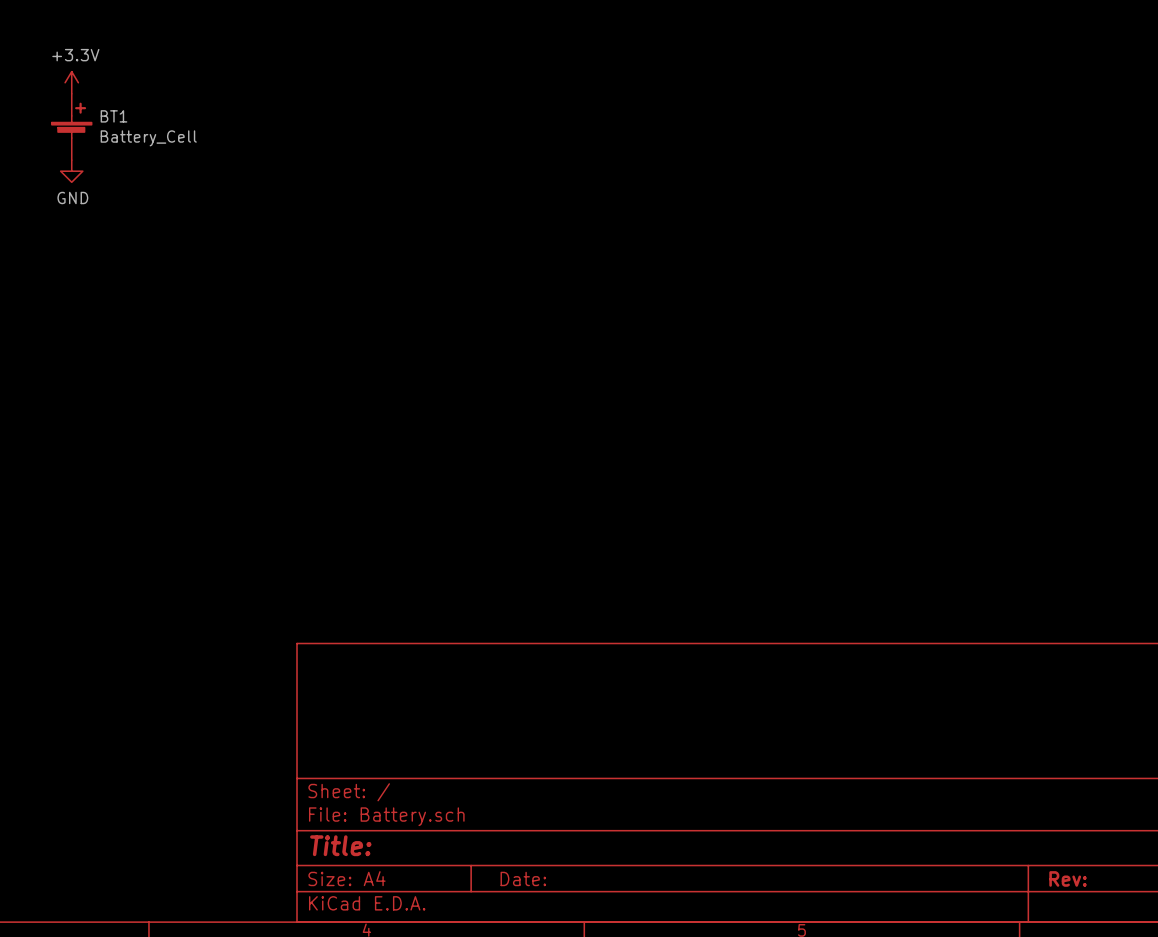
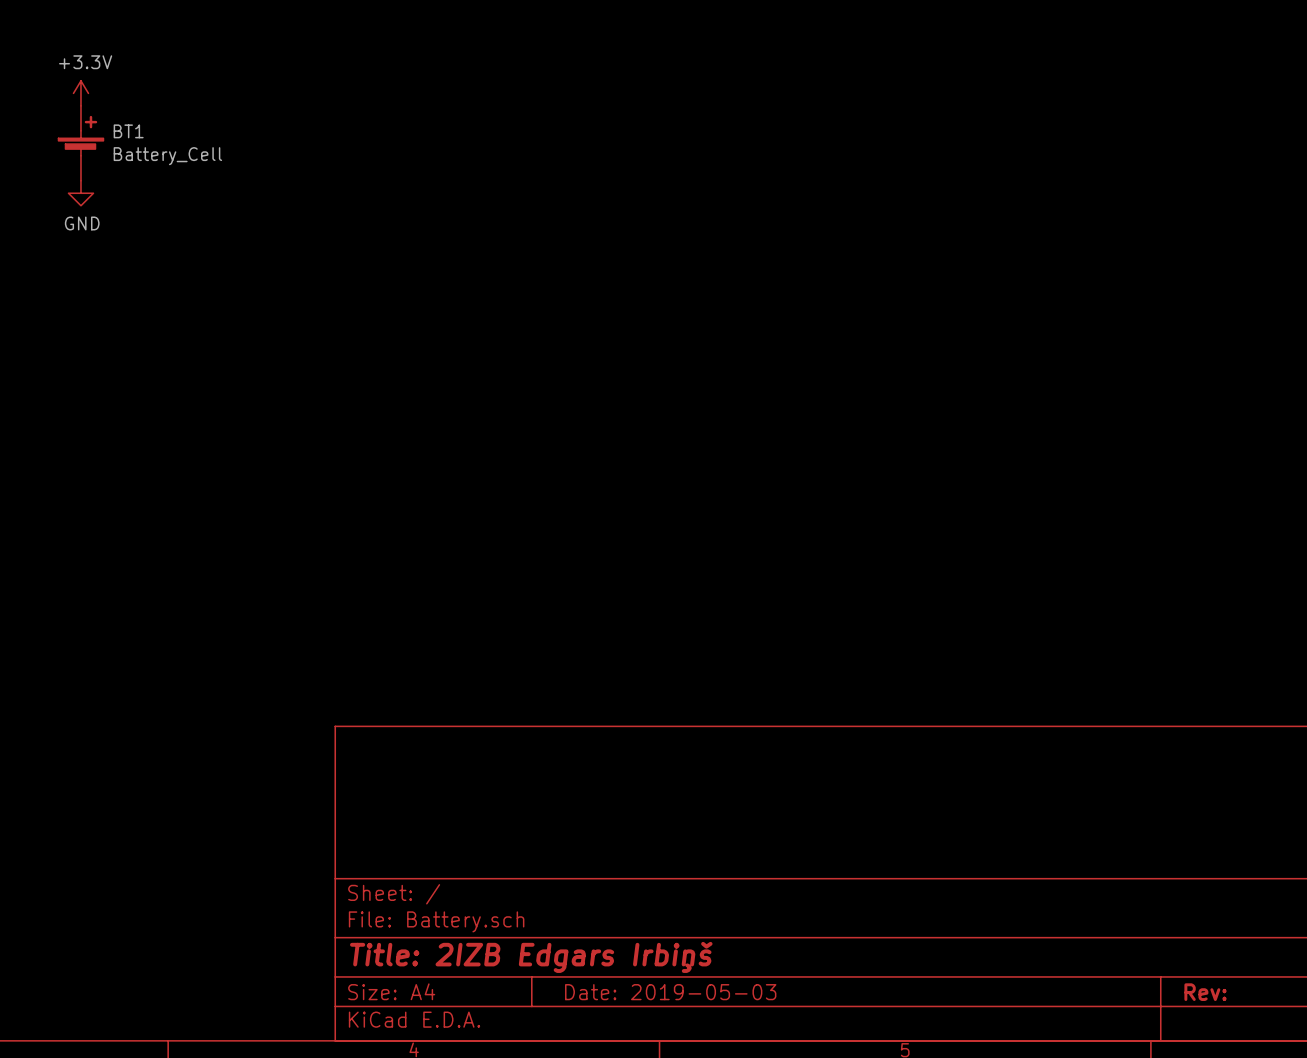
title block: Title: (340, 845) -> Title: 2IZB Edgars Irbiņš (531, 957)
title block: Date: (523, 878) -> Date: 2019-05-03 (670, 992)

